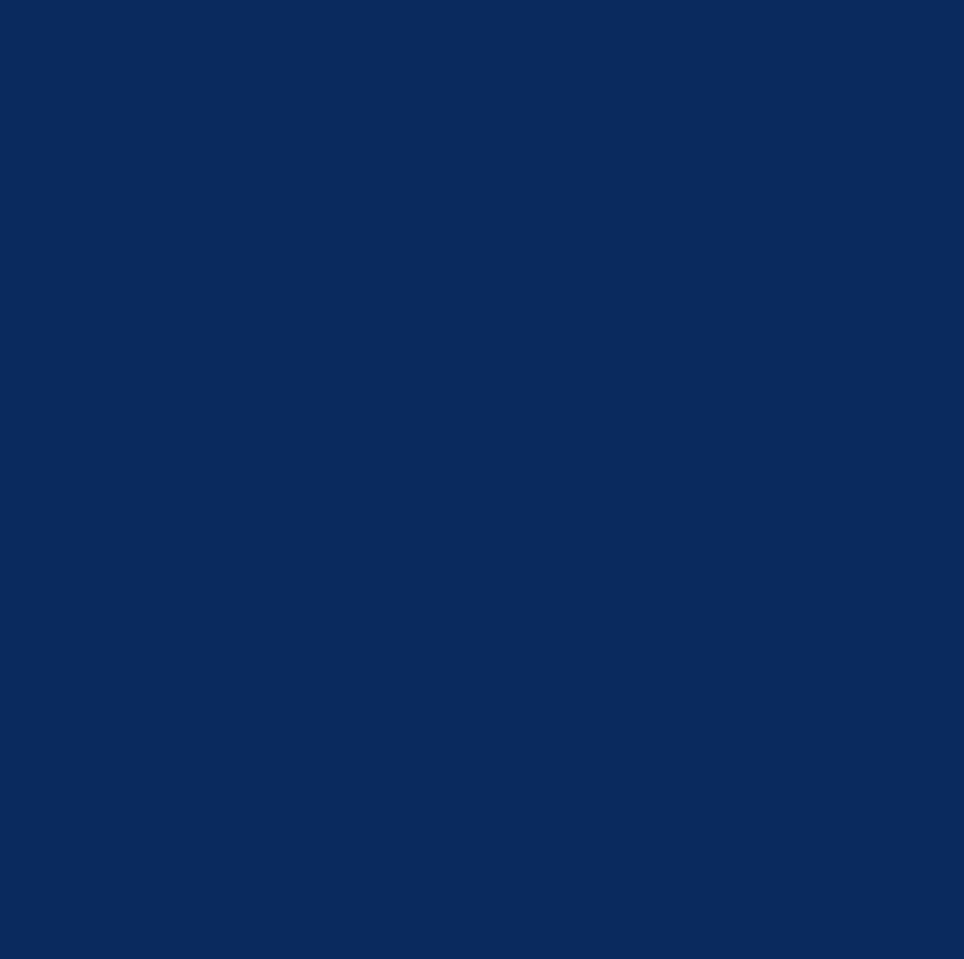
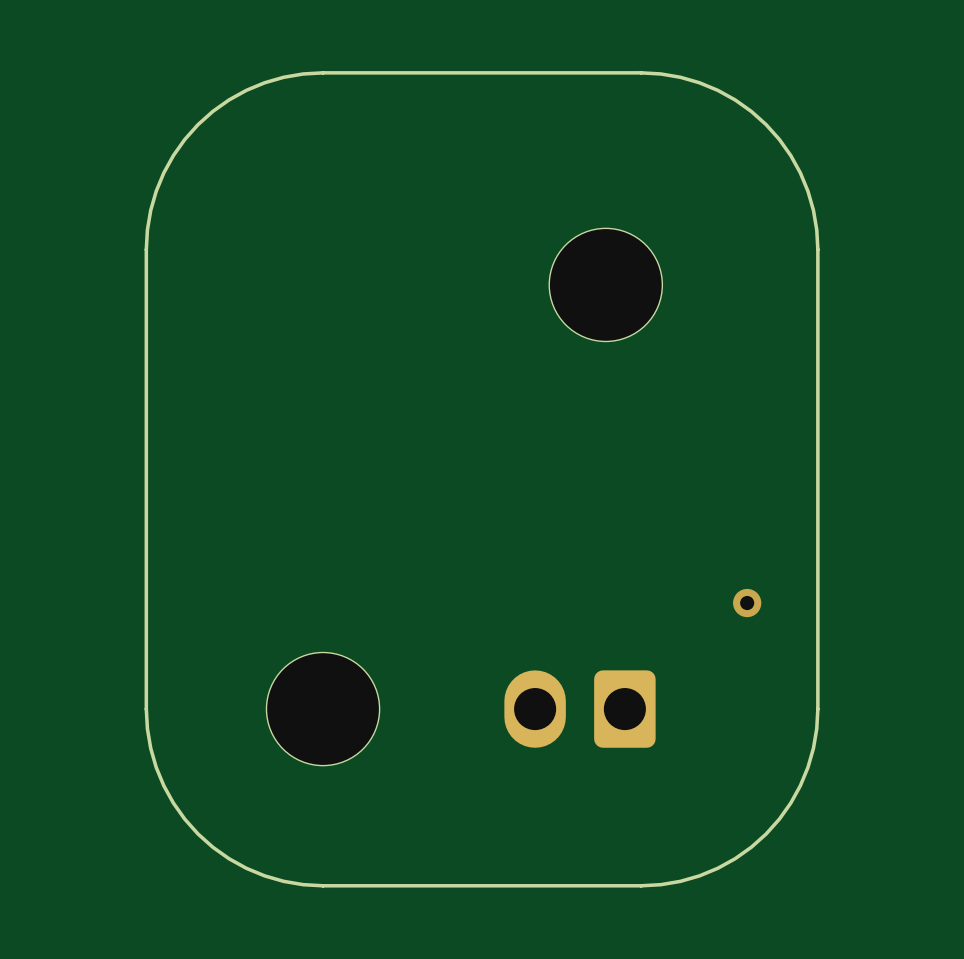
board edge: none -> (641, 72) (323, 72) (283, 77) (246, 90) (212, 111) (184, 139) (163, 172) (150, 210) (146, 249) (147, 728) (156, 767) (173, 803) (198, 834) (212, 847) (246, 868) (283, 881) (323, 885) (660, 884) (699, 875) (735, 858) (751, 847) (779, 819) (800, 785) (813, 748) (817, 709) (817, 249) (813, 210) (807, 191) (790, 155) (779, 139) (751, 111) (735, 99) (699, 82) (660, 73) (641, 72)
part: none -> (605, 284)
via: none -> (747, 603)
part: none -> (323, 709)
part: none -> (579, 709)

